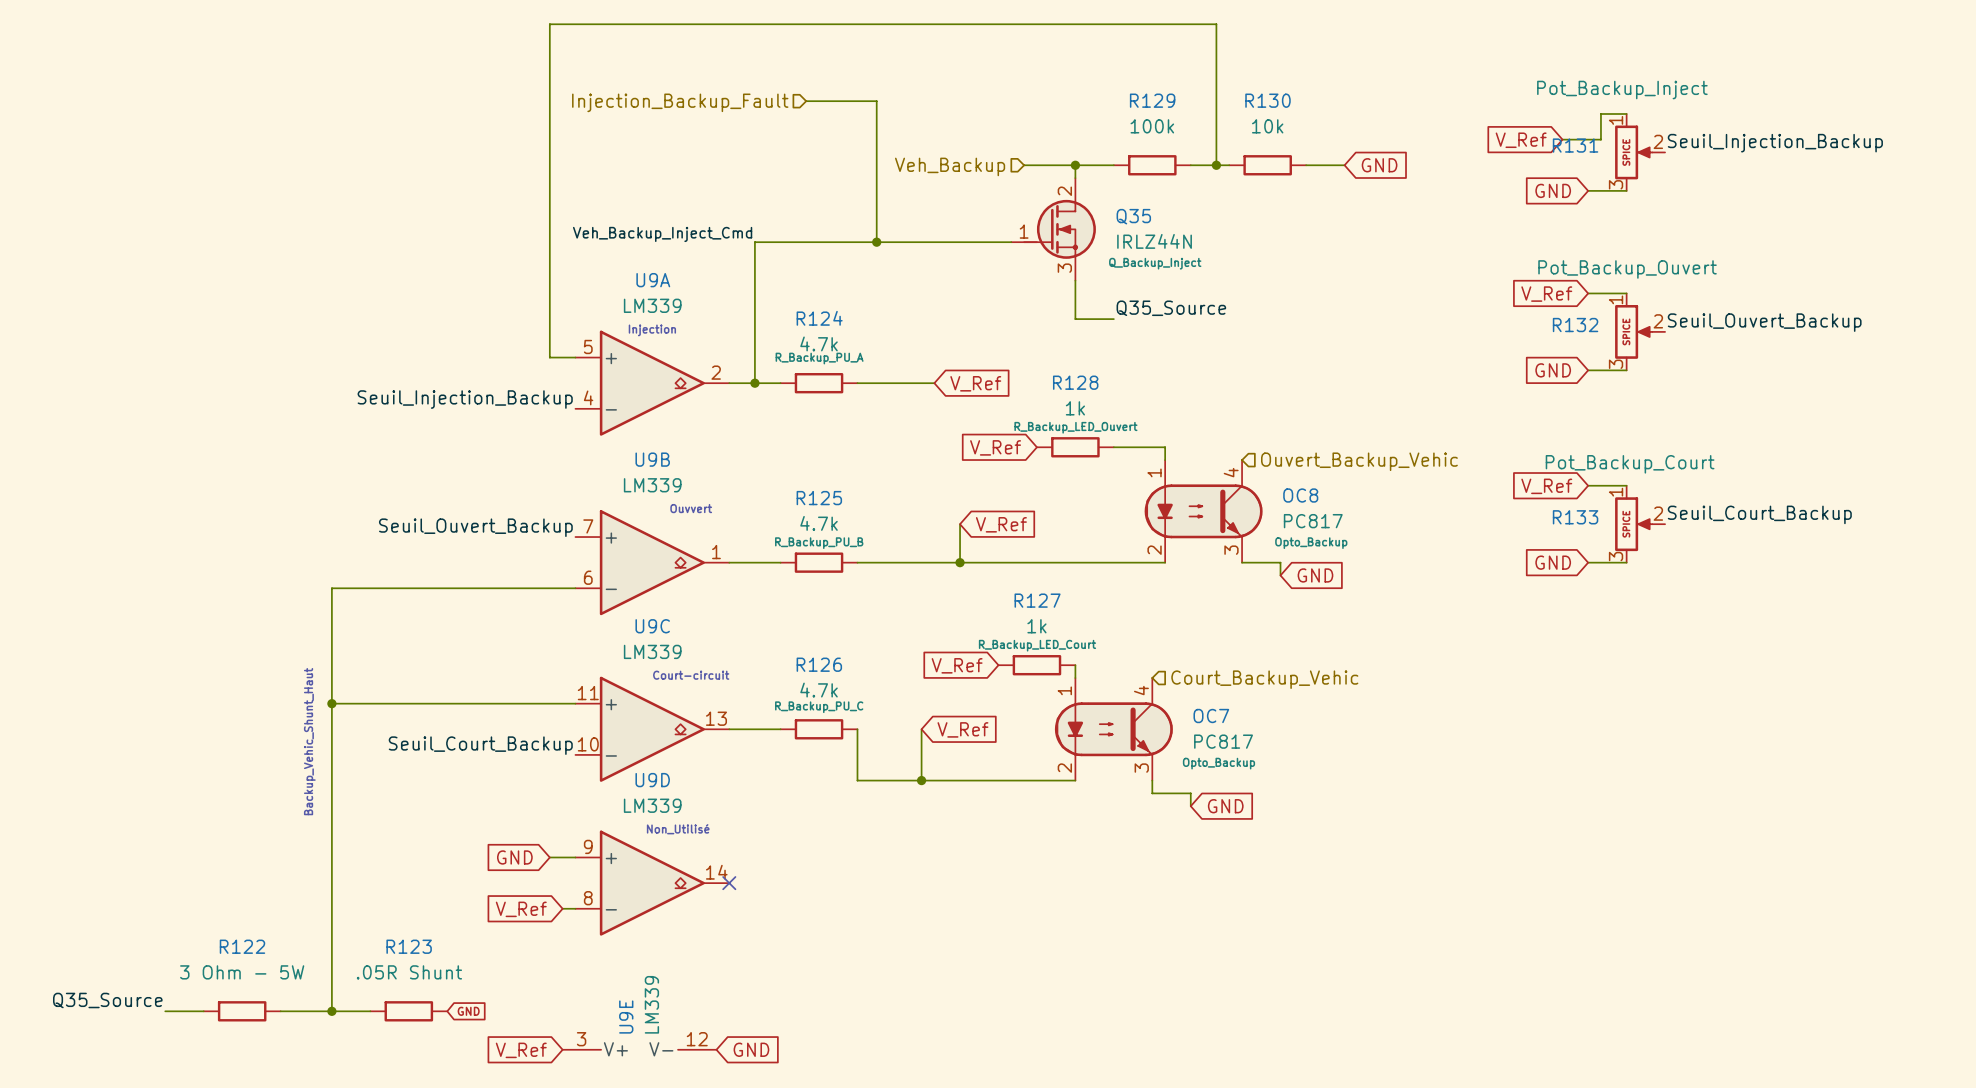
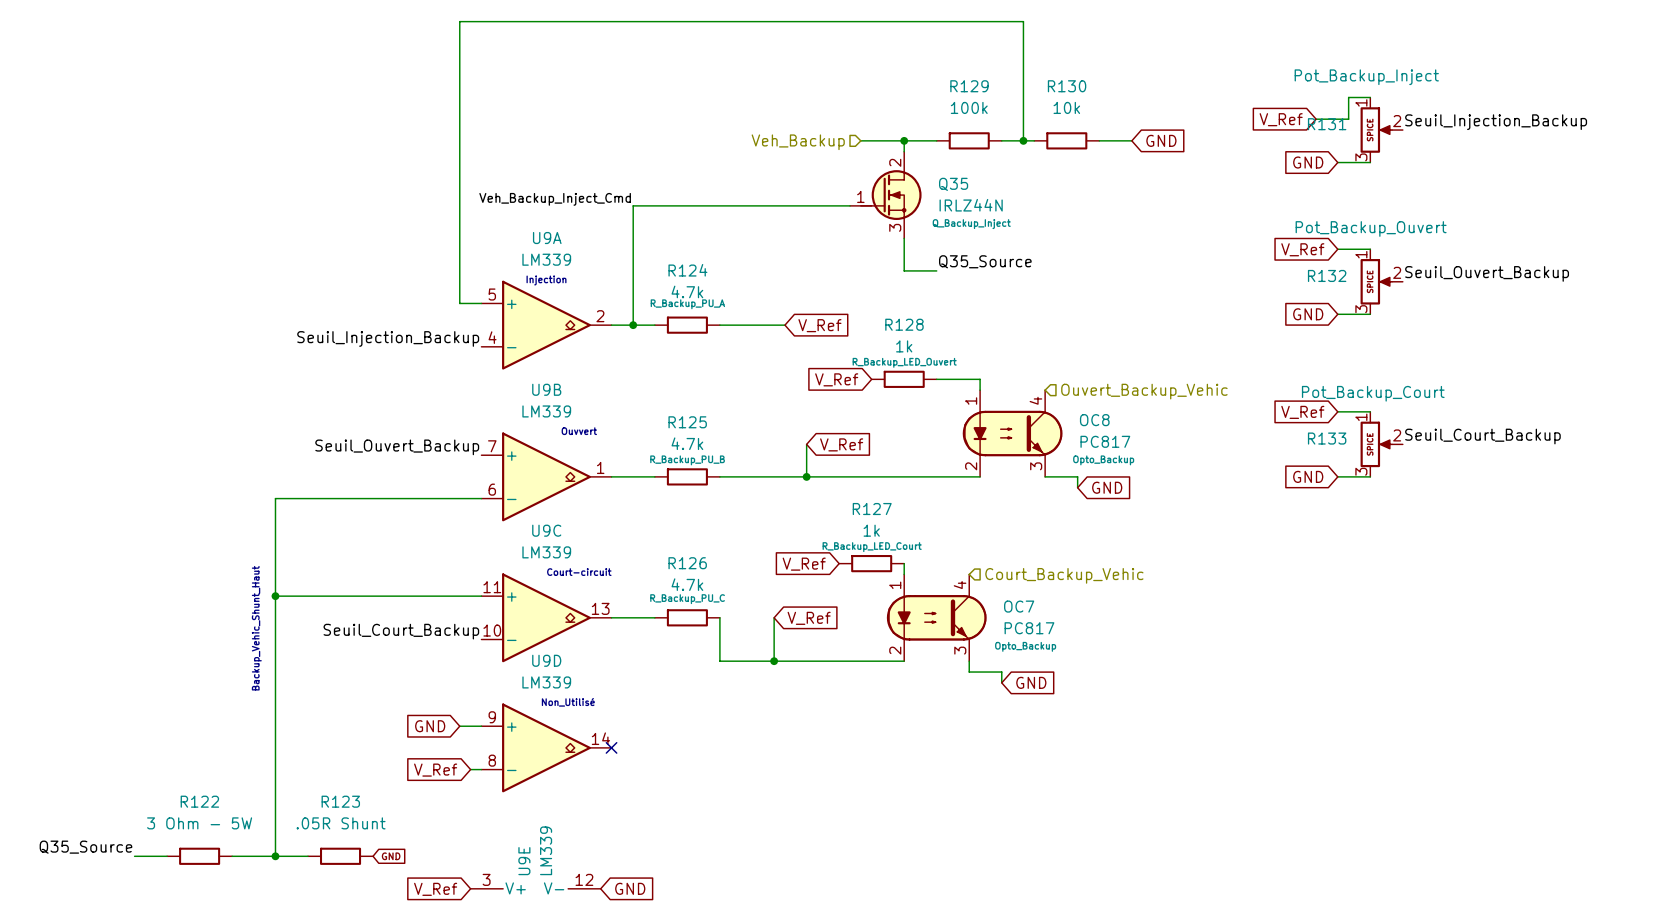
wire: (806, 101) (876, 101) (876, 242) -> none
hierarchical label: Injection_Backup_Fault (680, 102) -> none
junction: (876, 242) -> none

